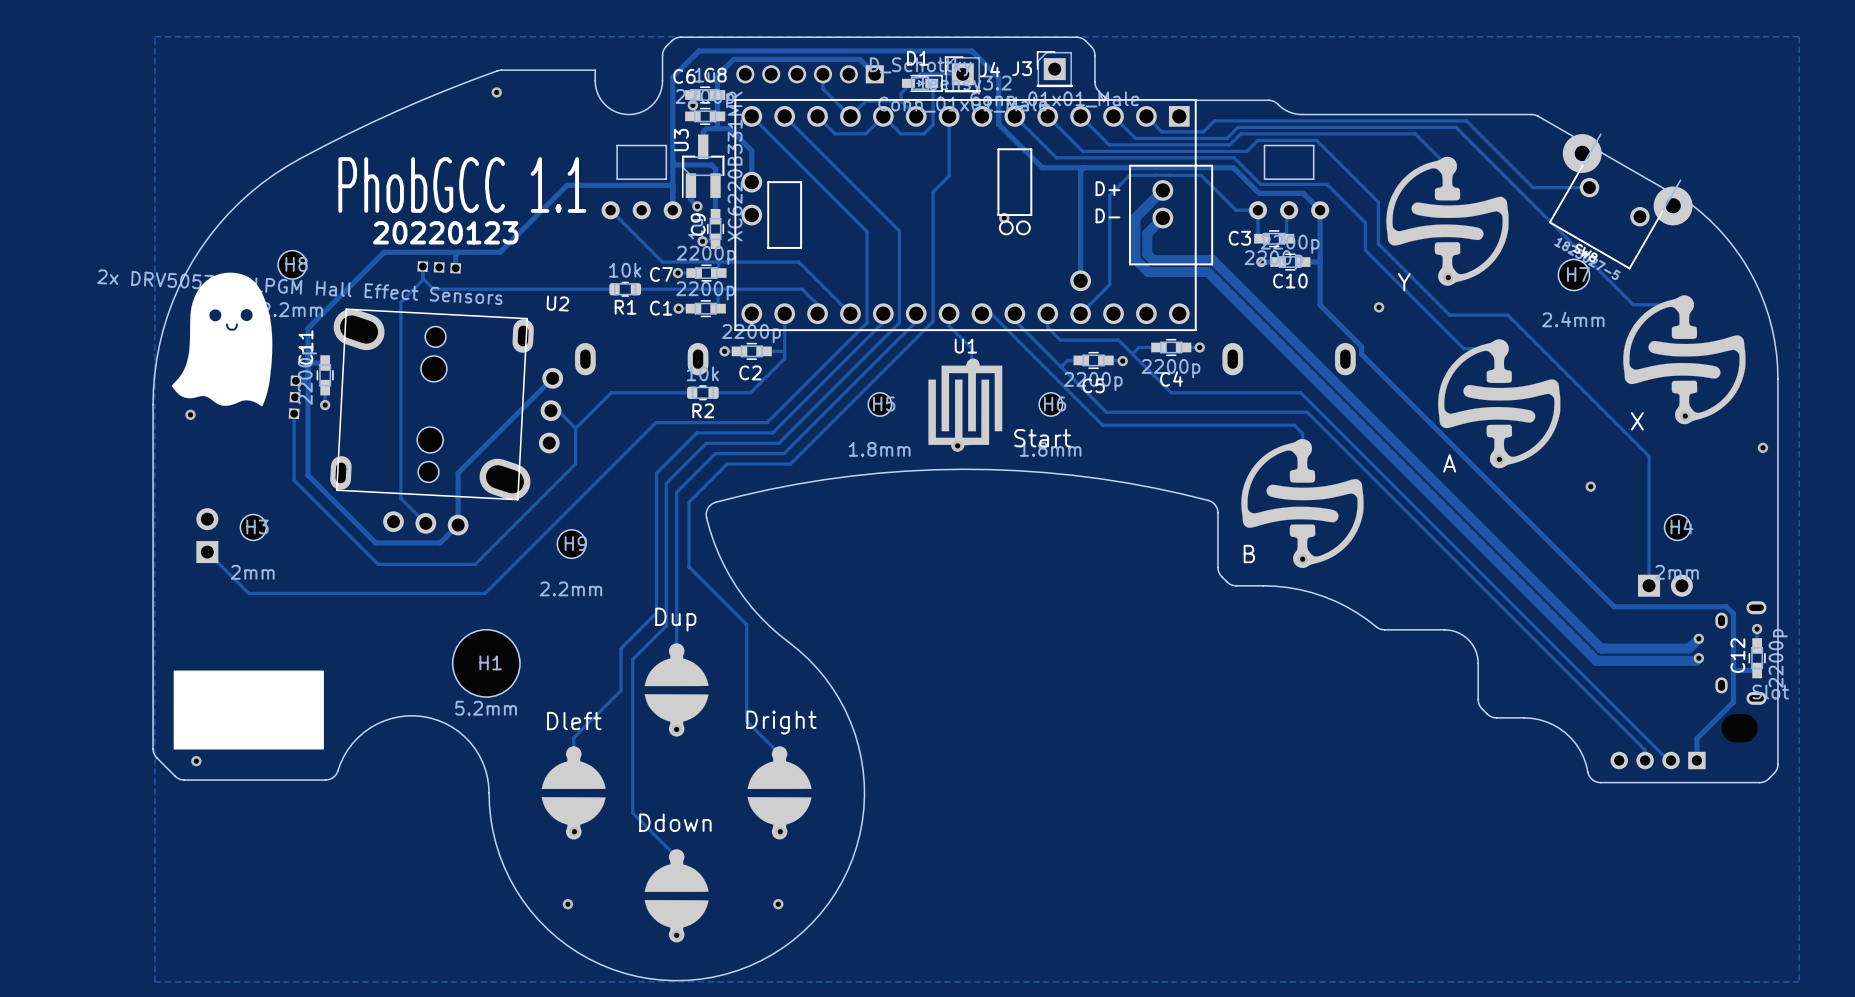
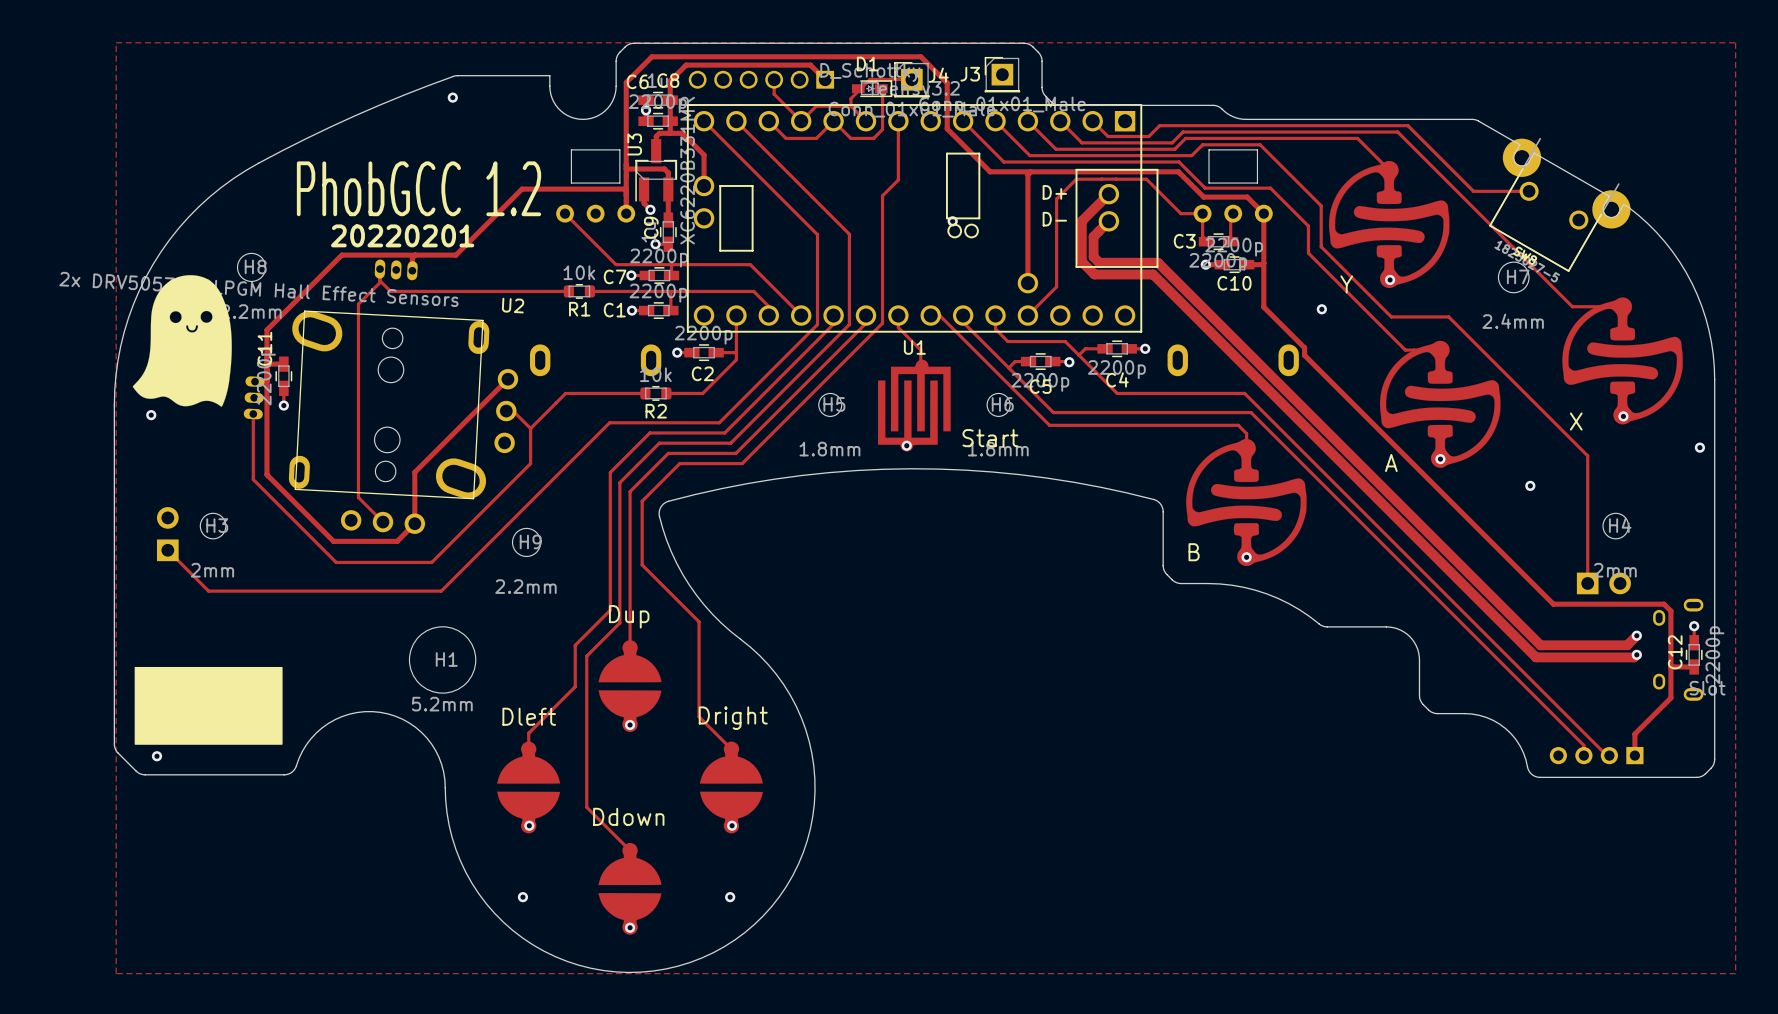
text: PhobGCC 1.1 (462, 185) -> PhobGCC 1.2 (419, 188)
text: 20220123 (445, 232) -> 20220201 (402, 235)
U2 footprint: [288, 261, 564, 536] -> [243, 259, 519, 534]

